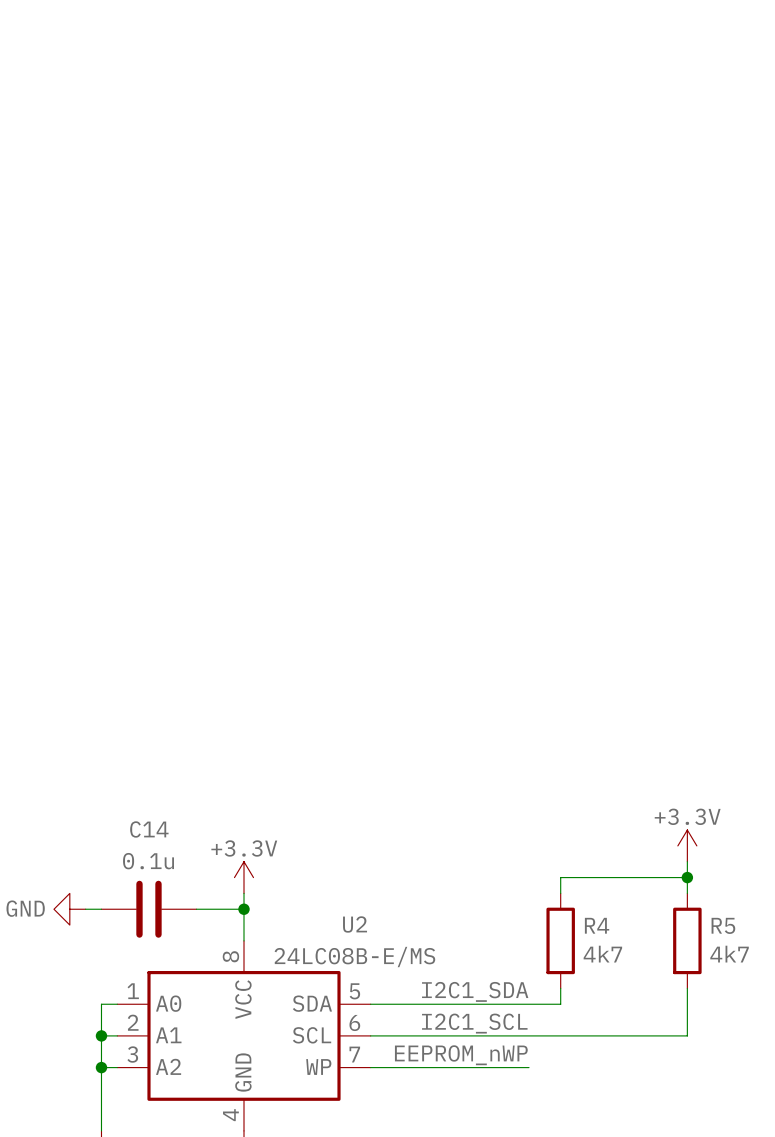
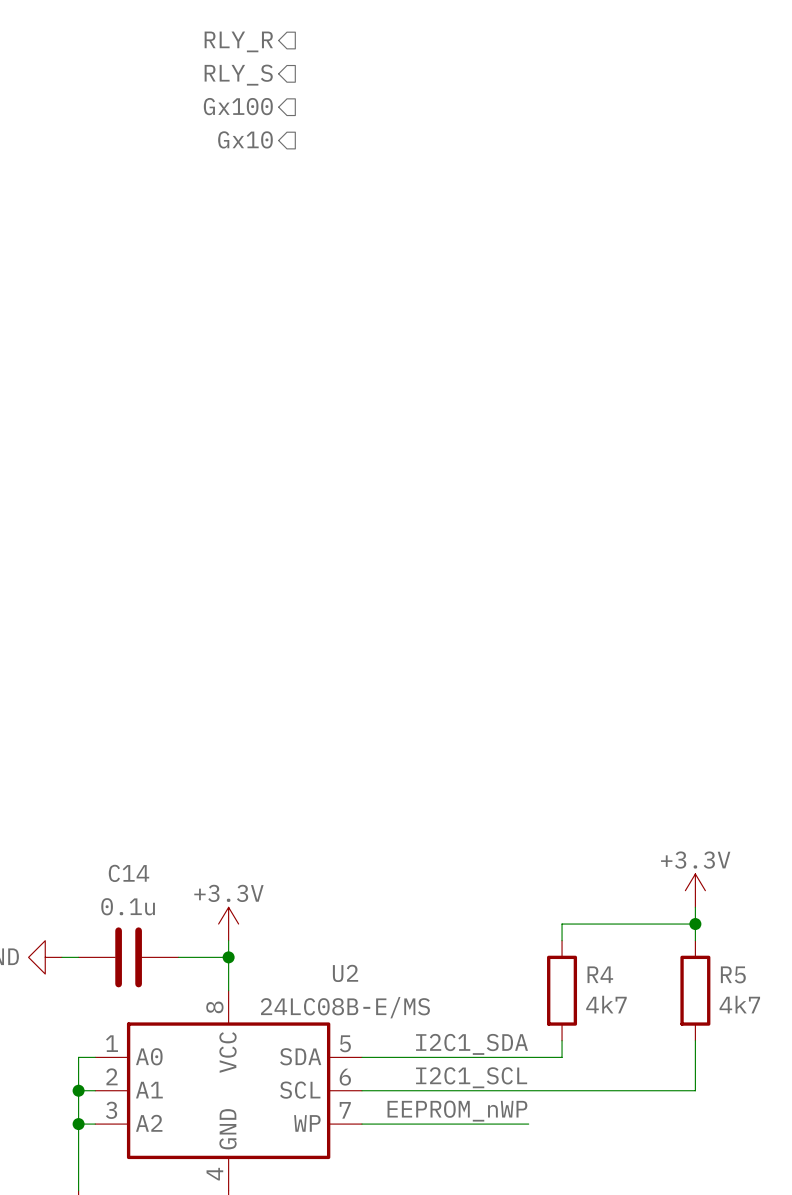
hierarchical label: none -> RLY_R (238, 41)
hierarchical label: none -> RLY_S (238, 75)
hierarchical label: none -> Gx100 (238, 106)
hierarchical label: none -> Gx10 (245, 139)

